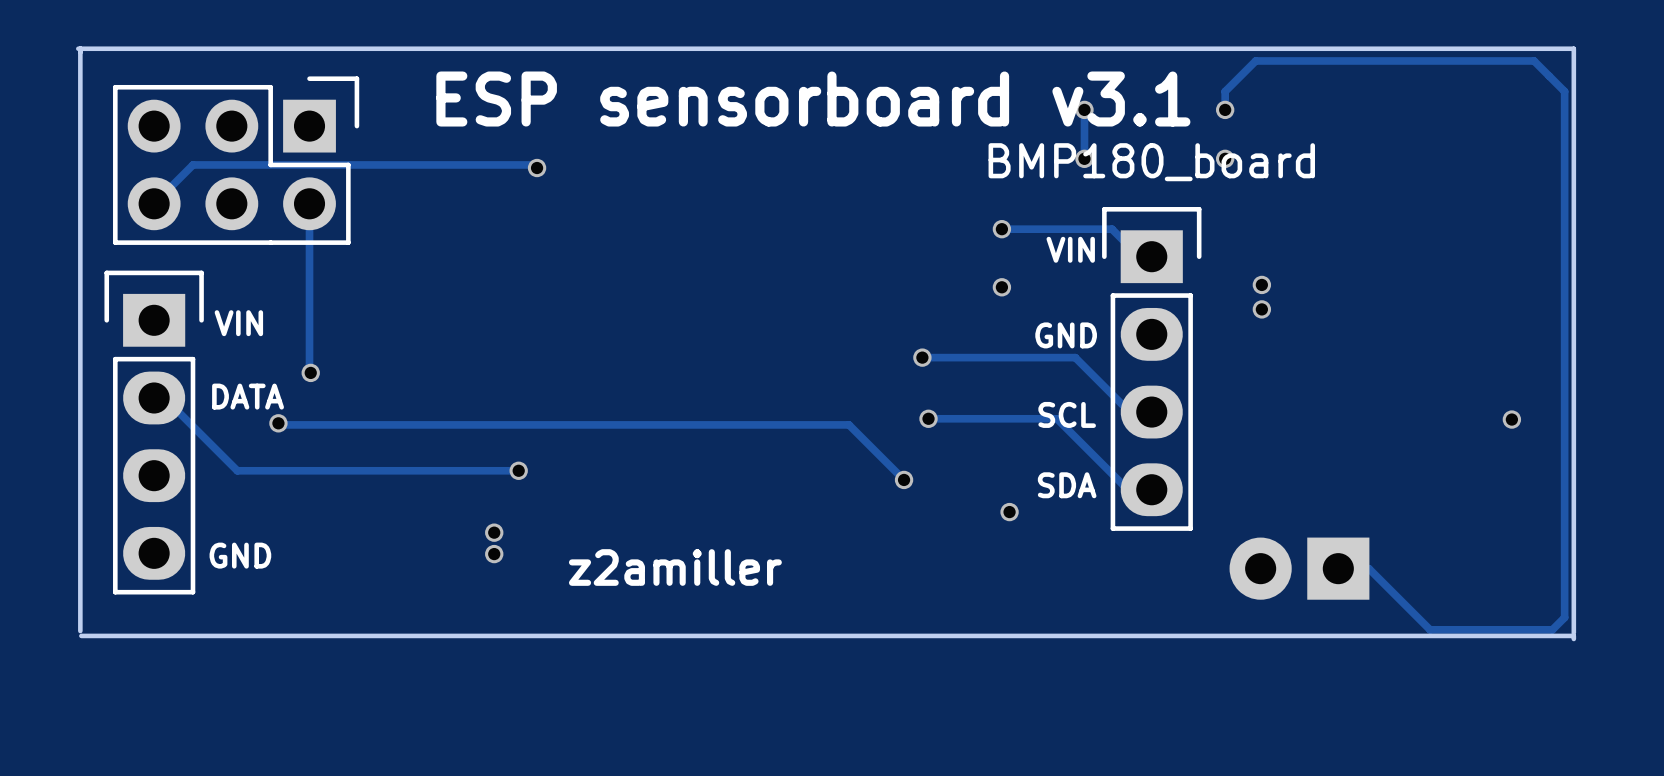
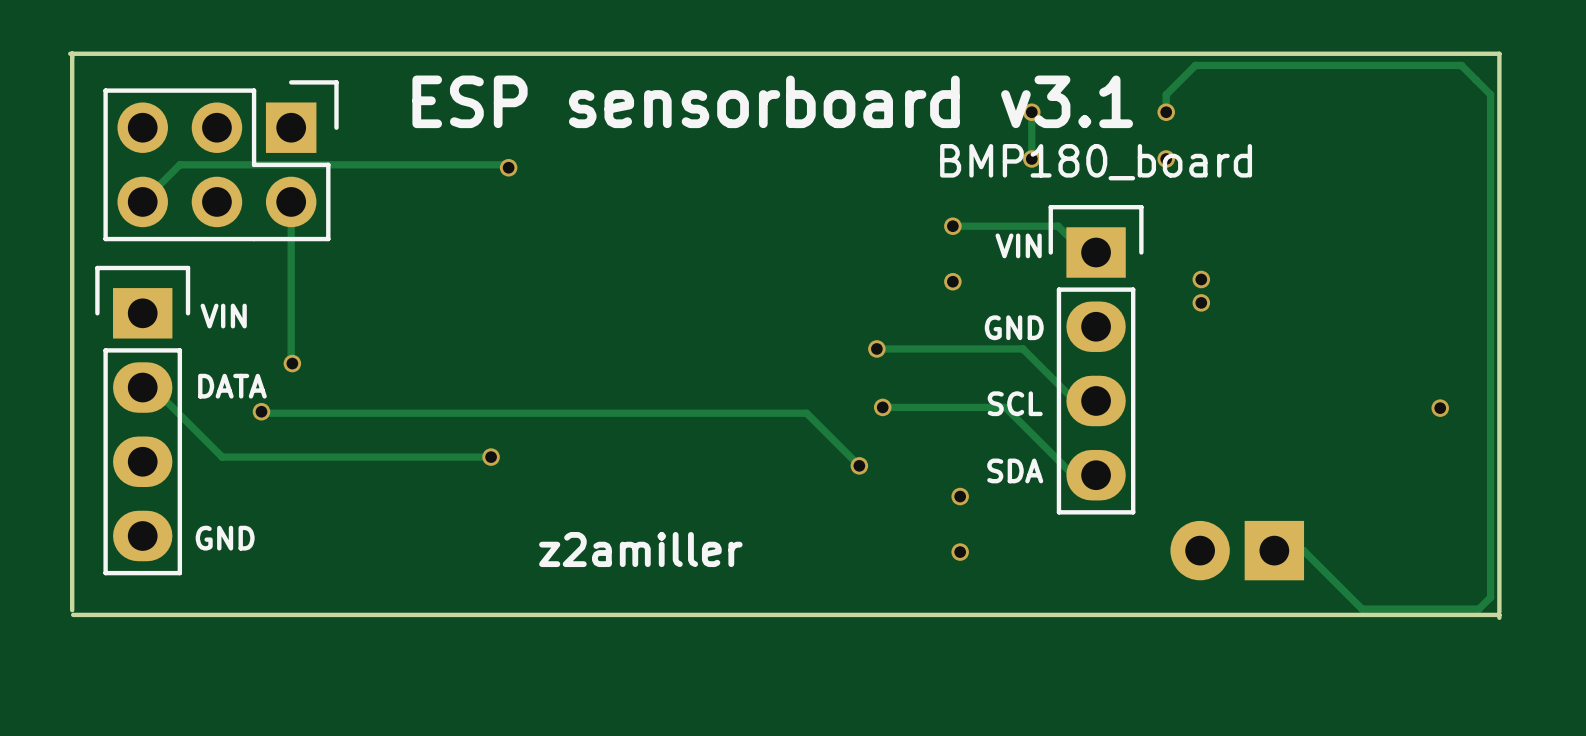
via: (494, 532) -> none
via: (494, 554) -> none
via: none -> (960, 552)

